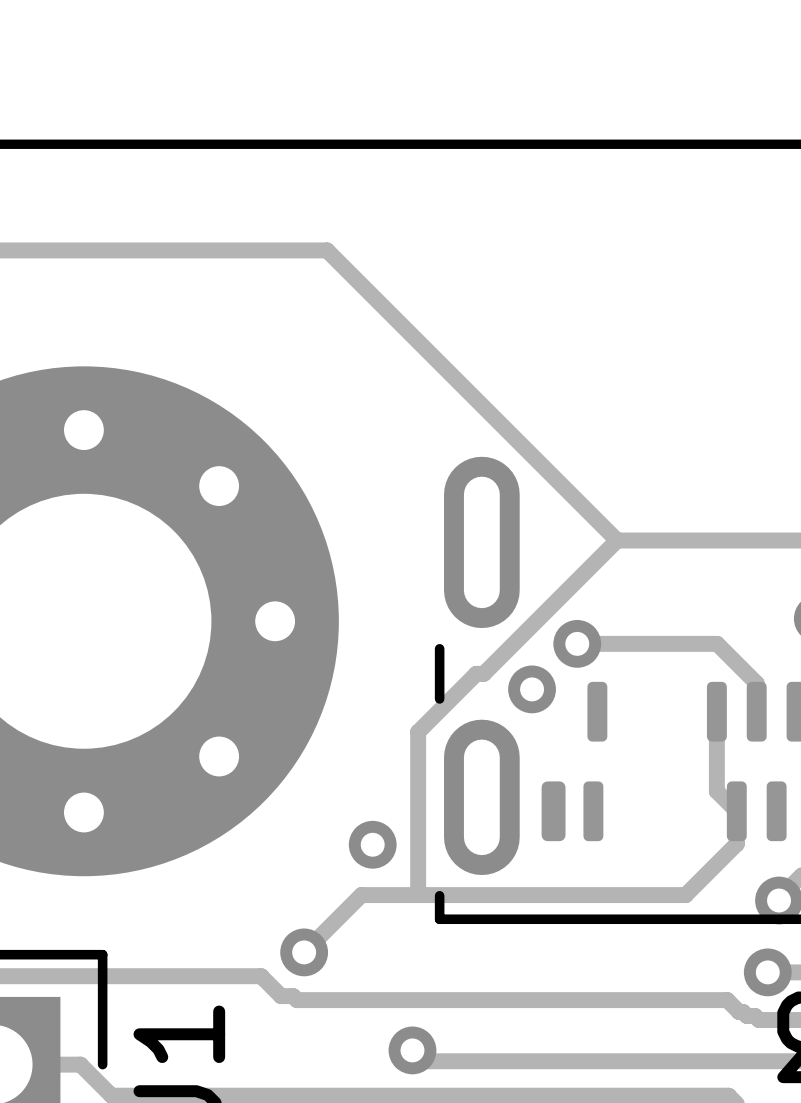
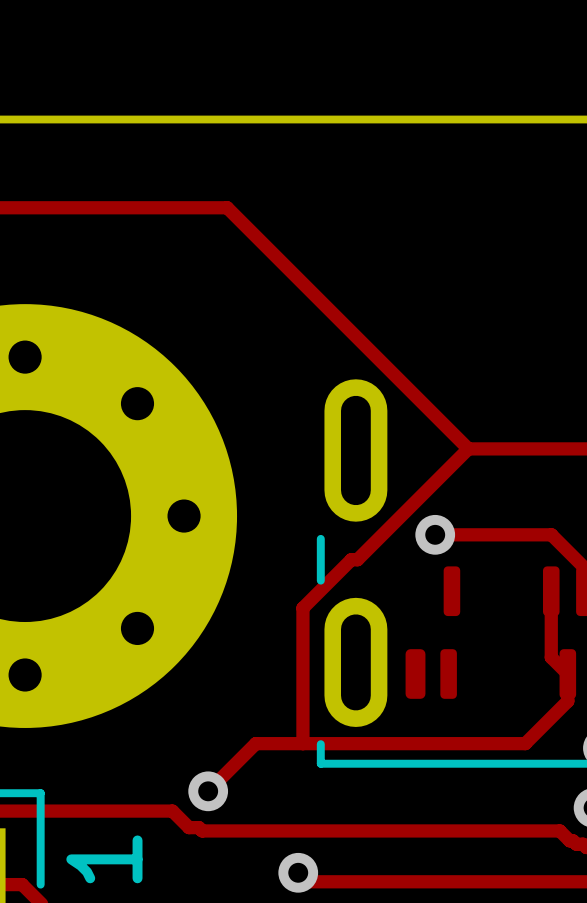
via: (532, 689) -> none
via: (372, 844) -> none

